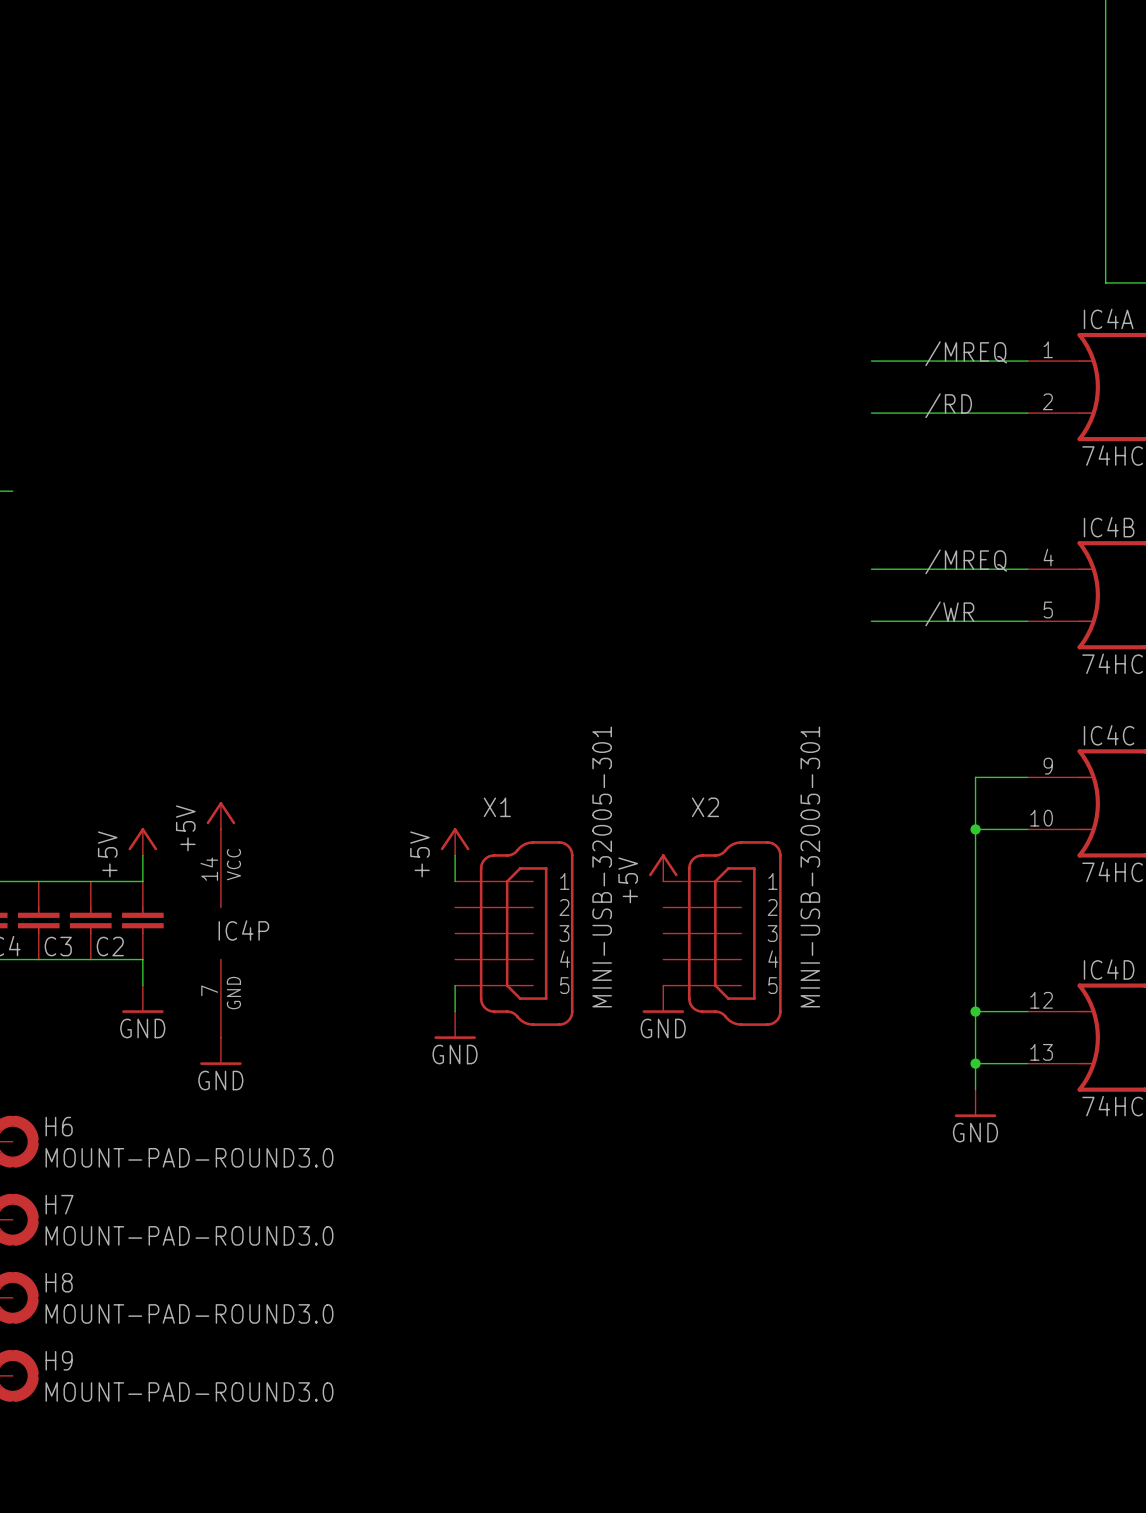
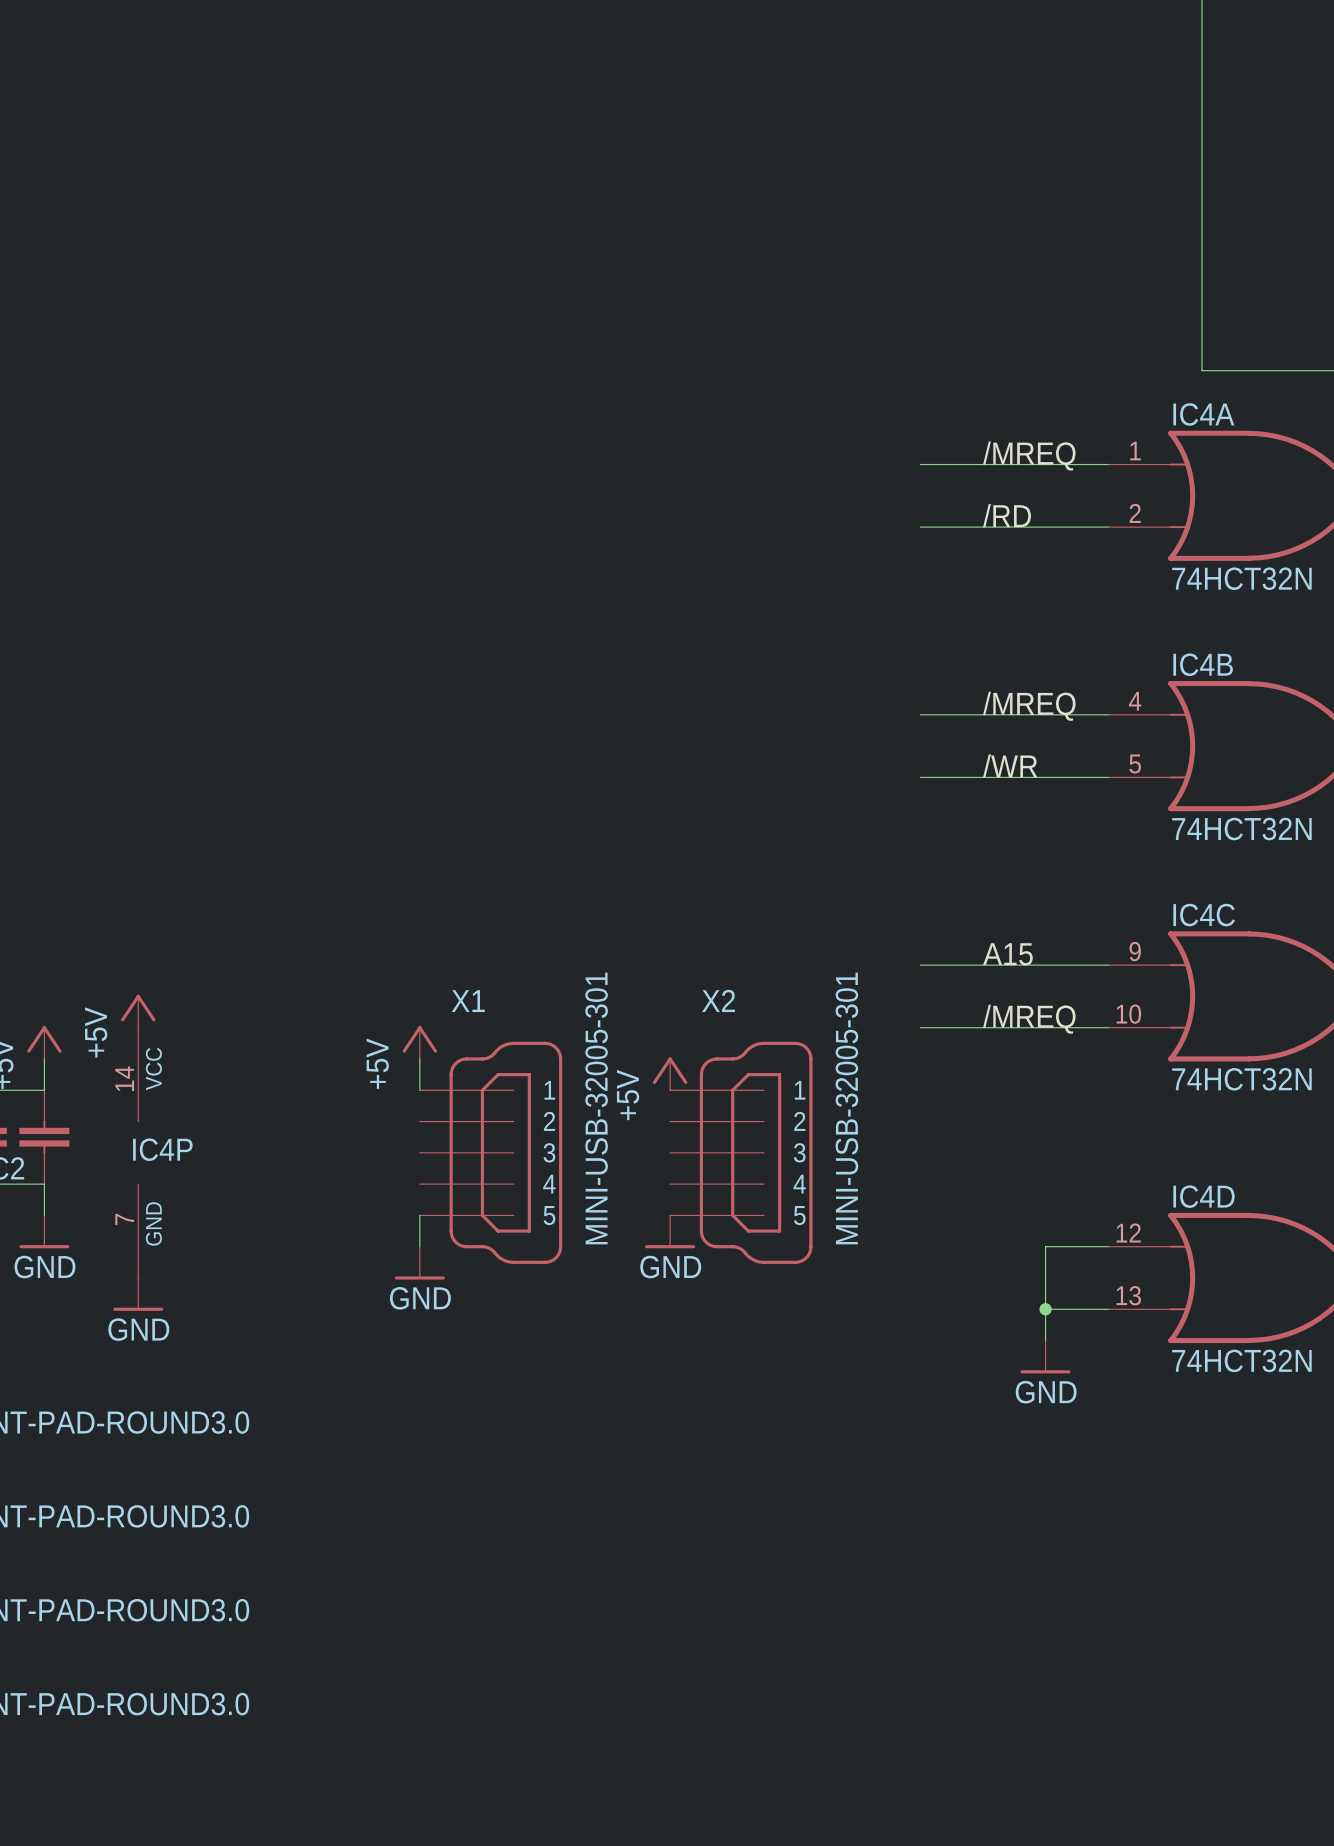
label: none -> A15 (1007, 954)
wire: (975, 777) (975, 1011) -> (1045, 965) (920, 965)
label: none -> /MREQ (1029, 1019)
wire: none -> (920, 1027) (1045, 1027)
junction: (975, 829) -> none
junction: (975, 1011) -> none

